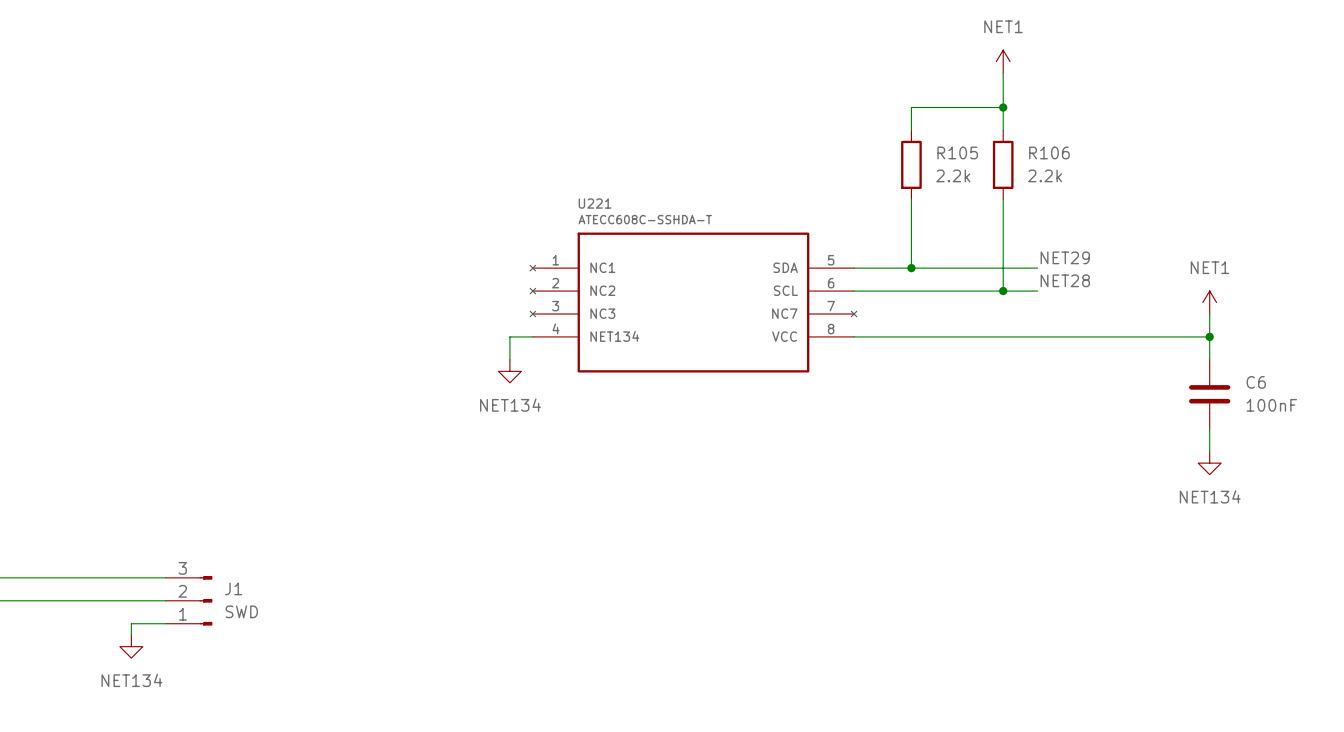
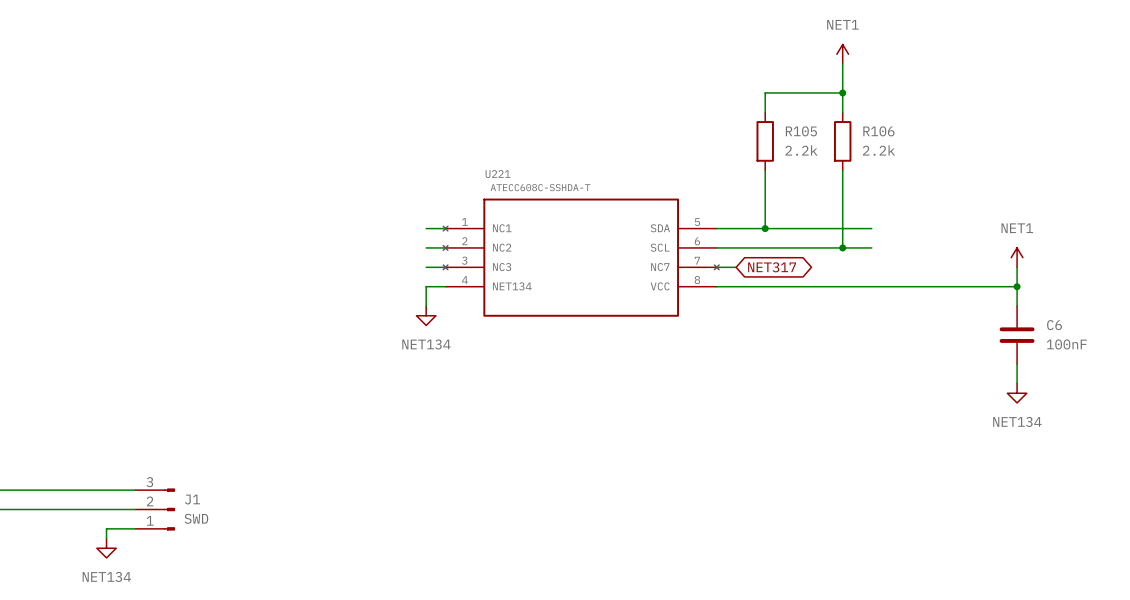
label: NET29 (1065, 257) -> none
wire: none -> (426, 228) (445, 228)
label: NET28 (1065, 280) -> none
wire: none -> (426, 247) (445, 247)
wire: none -> (426, 267) (445, 267)
wire: none -> (716, 267) (736, 267)
global label: none -> NET317 (772, 267)

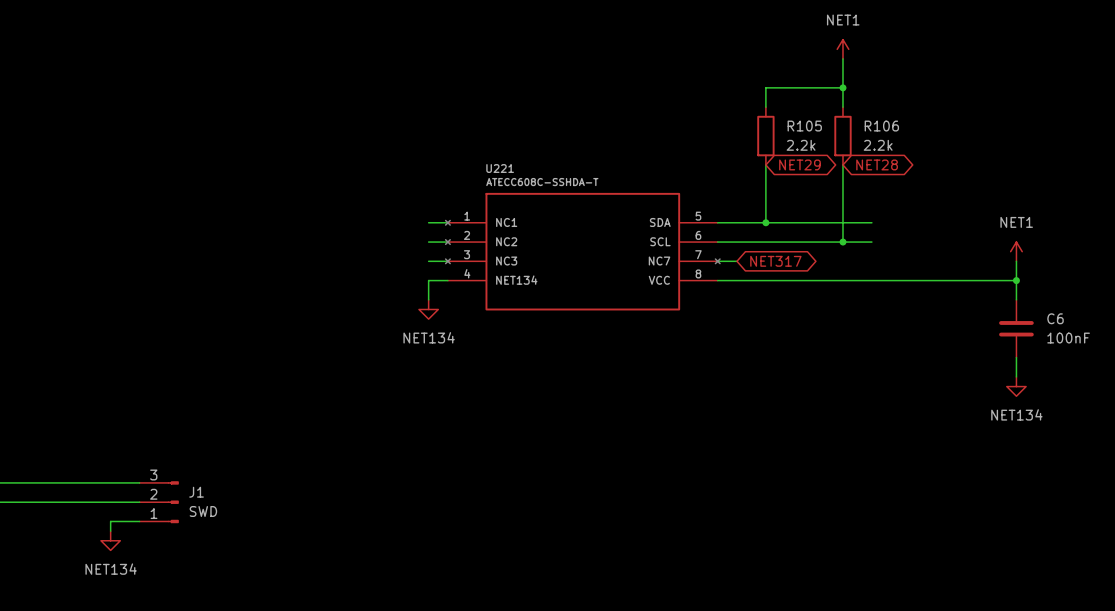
global label: none -> NET29 (799, 164)
global label: none -> NET28 (877, 164)

